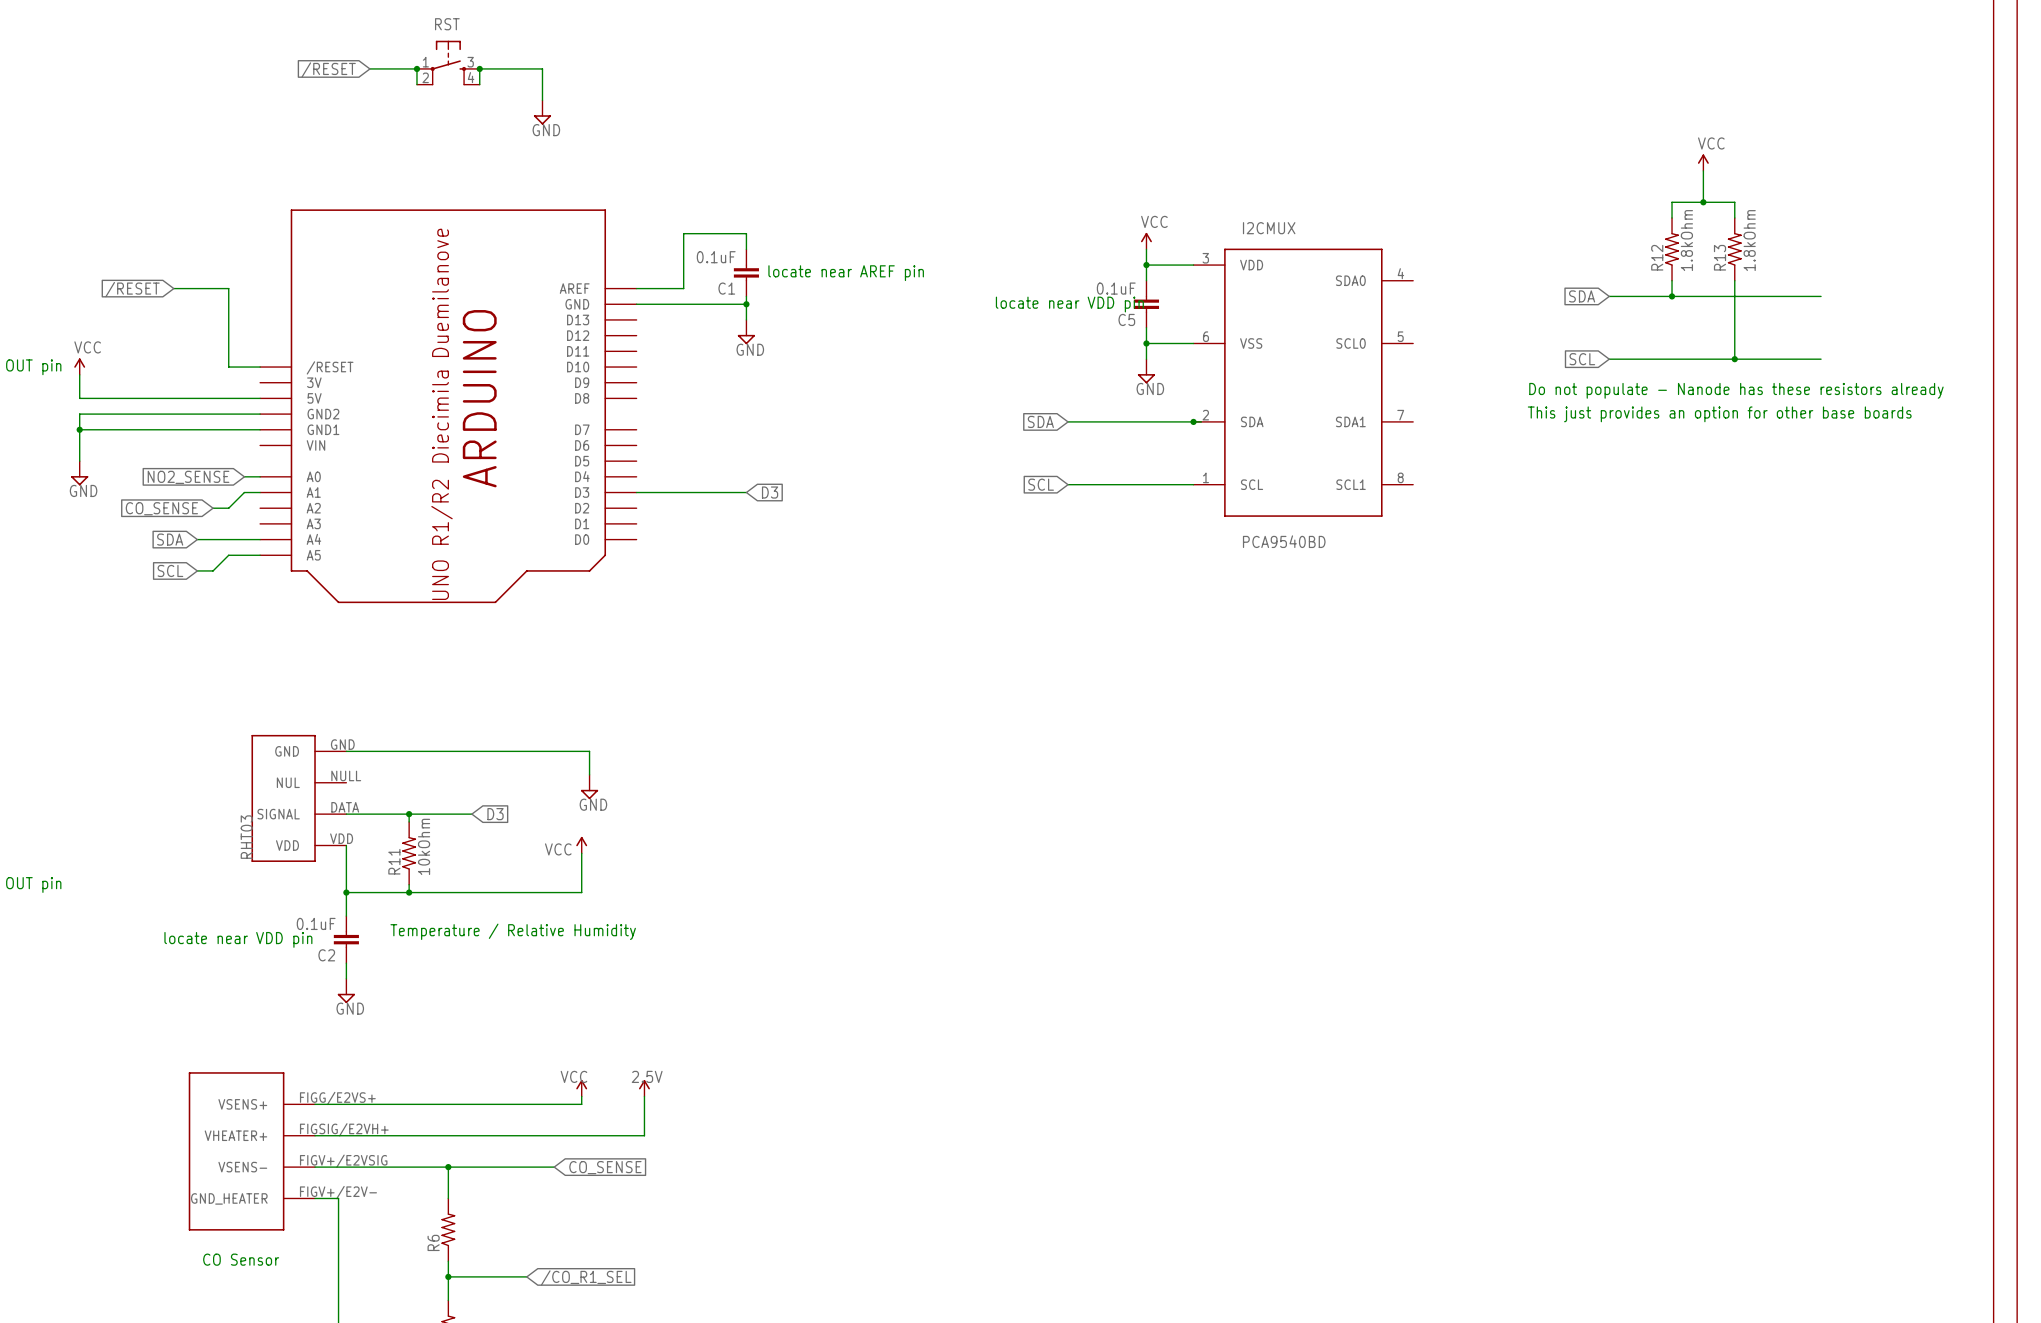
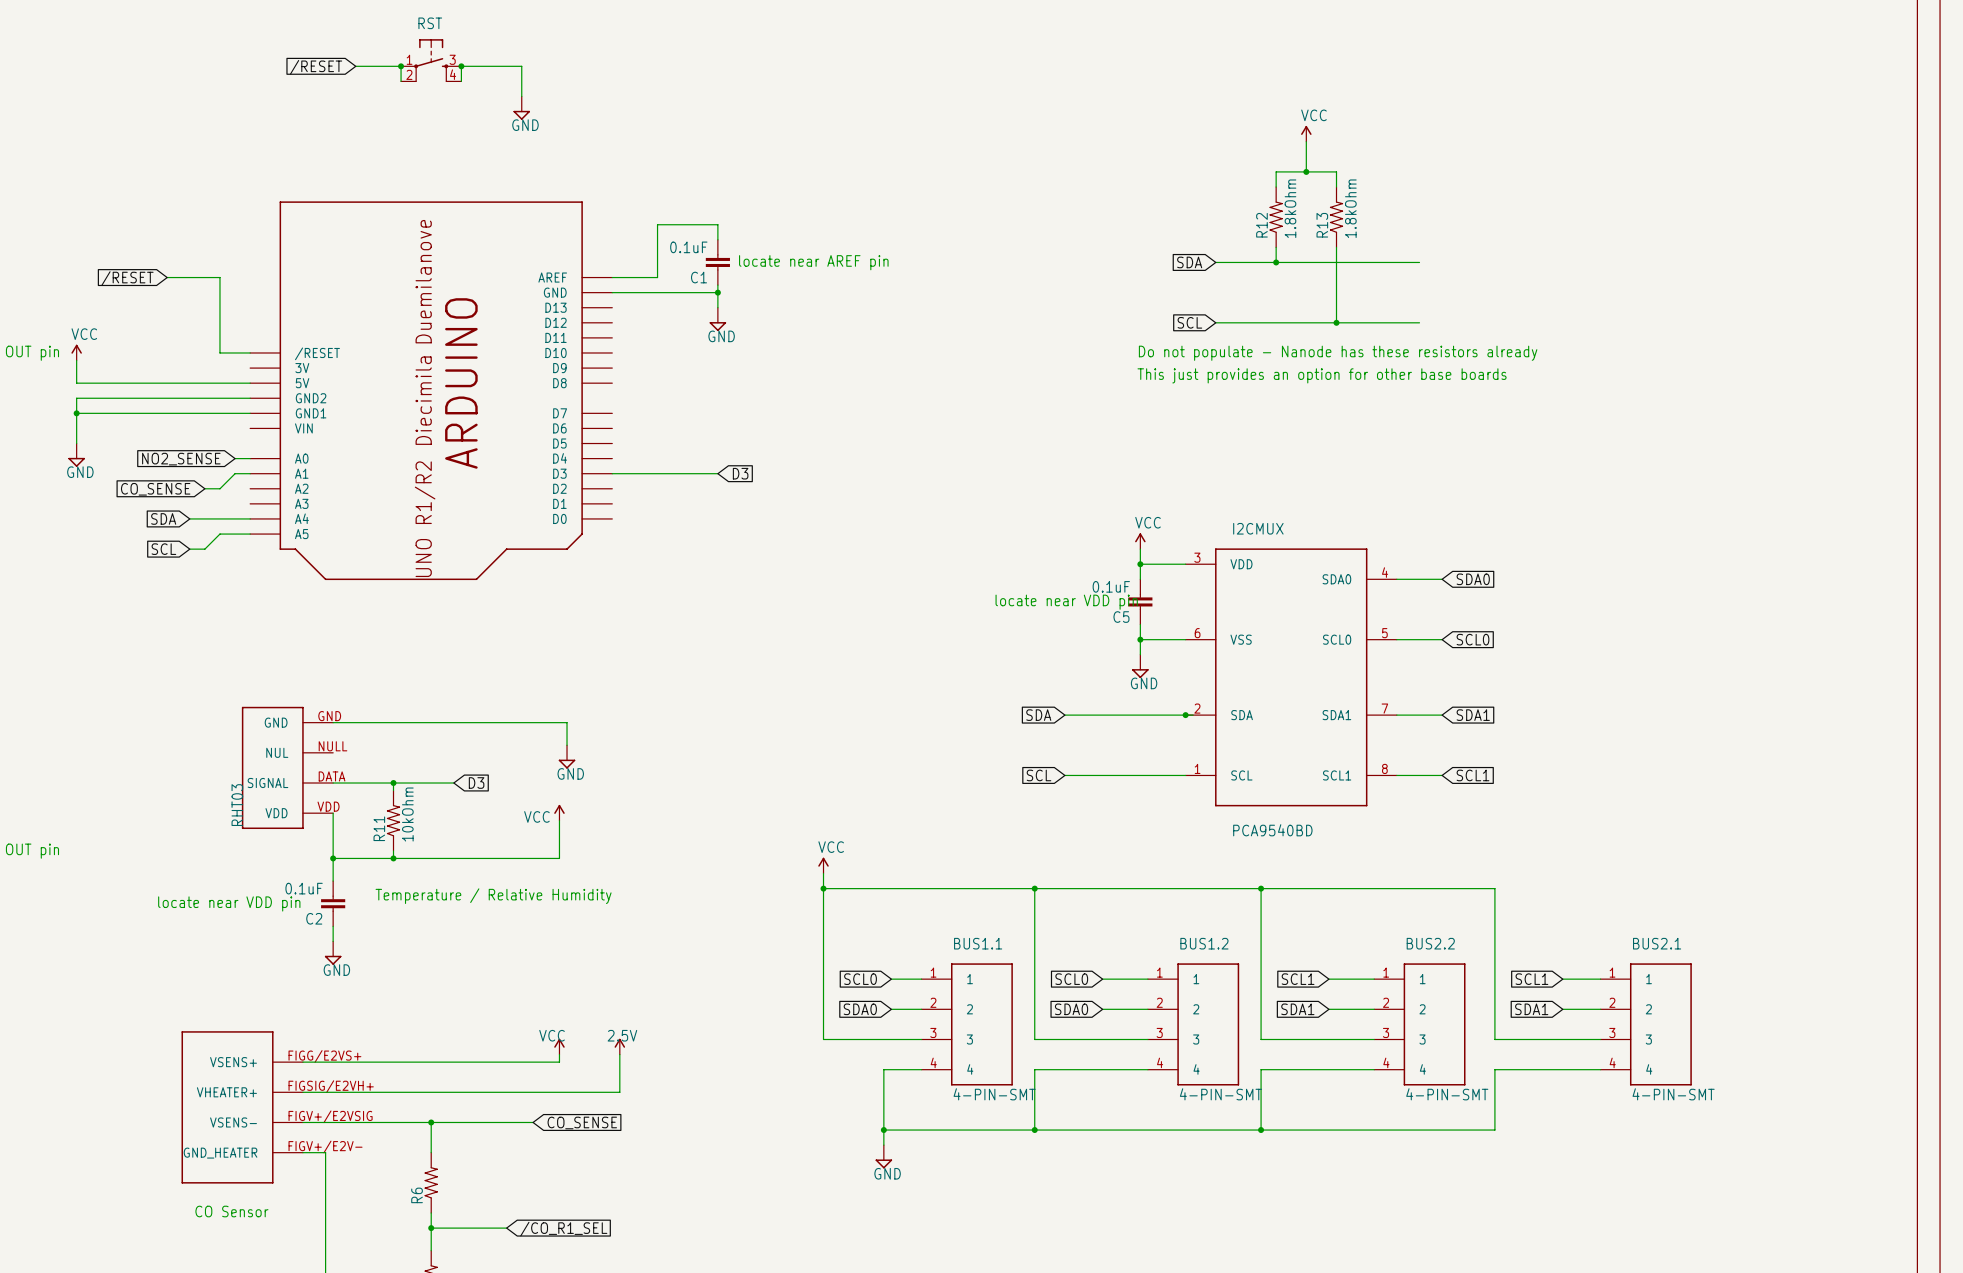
power symbol: none -> VCC (1306, 133)
wire: none -> (1306, 141) (1306, 171)
power symbol: VCC (1703, 162) -> none
wire: (1703, 170) (1703, 202) -> none
junction: none -> (1306, 171)
wire: none -> (1276, 187) (1276, 171) (1336, 171) (1336, 187)
junction: (1703, 202) -> none
wire: (1672, 217) (1672, 202) (1734, 202) (1734, 217) -> none
power symbol: VCC (1146, 241) -> none
wire: (1146, 249) (1146, 280) -> none
R12 position: (1672, 249) -> (1276, 217)
R13 position: (1734, 249) -> (1336, 217)
wire: none -> (1276, 247) (1276, 262)
wire: none -> (1336, 247) (1336, 322)
wire: (1146, 265) (1193, 265) -> none
junction: (1146, 265) -> none
global label: none -> SDA (1189, 262)
wire: none -> (1215, 262) (1419, 262)
junction: none -> (1276, 262)
wire: (1672, 280) (1672, 296) -> none
wire: (1734, 280) (1734, 359) -> none
global label: SDA (1582, 296) -> none
wire: (1609, 296) (1821, 296) -> none
junction: (1672, 296) -> none
text: locate near VDD pin (1069, 304) -> none
C5 position: (1146, 304) -> (1140, 601)
wire: (1146, 327) (1146, 359) -> none
global label: none -> SCL (1189, 322)
wire: none -> (1215, 322) (1419, 322)
junction: none -> (1336, 322)
wire: (1146, 343) (1193, 343) -> none
junction: (1146, 343) -> none
global label: SCL (1582, 359) -> none
wire: (1609, 359) (1821, 359) -> none
junction: (1734, 359) -> none
text: none -> Do not populate - Nanode has these resistors already (1338, 353)
power symbol: GND (1146, 371) -> none
I2CMUX position: (1303, 382) -> (1291, 677)
text: none -> This just provides an option for other base boards (1322, 375)
text: Do not populate - Nanode has these resistors already (1736, 390) -> none
text: This just provides an option for other base boards (1719, 414) -> none
global label: SDA (1040, 421) -> none
wire: (1068, 421) (1201, 421) -> none
junction: (1193, 421) -> none
global label: SCL (1041, 484) -> none
wire: (1068, 484) (1193, 484) -> none
power symbol: none -> VCC (1140, 541)
wire: none -> (1140, 549) (1140, 579)
wire: none -> (1140, 564) (1185, 564)
junction: none -> (1140, 564)
wire: none -> (1396, 579) (1442, 579)
global label: none -> SDA0 (1473, 579)
text: none -> locate near VDD pin (1066, 602)
wire: none -> (1140, 624) (1140, 654)
wire: none -> (1140, 639) (1185, 639)
junction: none -> (1140, 639)
wire: none -> (1396, 639) (1442, 639)
global label: none -> SCL0 (1473, 639)
power symbol: none -> GND (1140, 666)
global label: none -> SDA (1038, 715)
wire: none -> (1064, 715) (1193, 715)
junction: none -> (1185, 715)
wire: none -> (1396, 715) (1442, 715)
global label: none -> SDA1 (1473, 715)
global label: none -> SCL (1039, 775)
wire: none -> (1064, 775) (1185, 775)
wire: none -> (1396, 775) (1442, 775)
global label: none -> SCL1 (1473, 775)
power symbol: none -> VCC (823, 865)
wire: none -> (823, 873) (823, 1039) (921, 1039)
wire: none -> (823, 888) (1494, 888) (1494, 1039) (1600, 1039)
junction: none -> (823, 888)
wire: none -> (1034, 888) (1034, 1039) (1147, 1039)
junction: none -> (1034, 888)
wire: none -> (1261, 888) (1261, 1039) (1374, 1039)
junction: none -> (1261, 888)
global label: none -> SCL0 (860, 979)
wire: none -> (891, 979) (921, 979)
global label: none -> SCL0 (1071, 979)
wire: none -> (1102, 979) (1147, 979)
global label: none -> SCL1 (1298, 979)
wire: none -> (1328, 979) (1374, 979)
global label: none -> SCL1 (1531, 979)
wire: none -> (1562, 979) (1600, 979)
global label: none -> SDA0 (860, 1009)
wire: none -> (891, 1009) (921, 1009)
global label: none -> SDA0 (1071, 1009)
wire: none -> (1102, 1009) (1147, 1009)
global label: none -> SDA1 (1297, 1009)
wire: none -> (1328, 1009) (1374, 1009)
global label: none -> SDA1 (1531, 1009)
wire: none -> (1562, 1009) (1600, 1009)
BUS1.1: none -> 4-PIN-SMT (967, 1024)
BUS1.2: none -> 4-PIN-SMT (1193, 1024)
BUS2.2: none -> 4-PIN-SMT (1419, 1024)
BUS2.1: none -> 4-PIN-SMT (1646, 1024)
wire: none -> (921, 1069) (883, 1069) (883, 1145)
wire: none -> (1147, 1069) (1034, 1069) (1034, 1130)
wire: none -> (1374, 1069) (1261, 1069) (1261, 1130)
wire: none -> (1600, 1069) (1494, 1069) (1494, 1130) (883, 1130)
junction: none -> (883, 1130)
junction: none -> (1034, 1130)
junction: none -> (1261, 1130)
power symbol: none -> GND (883, 1156)

